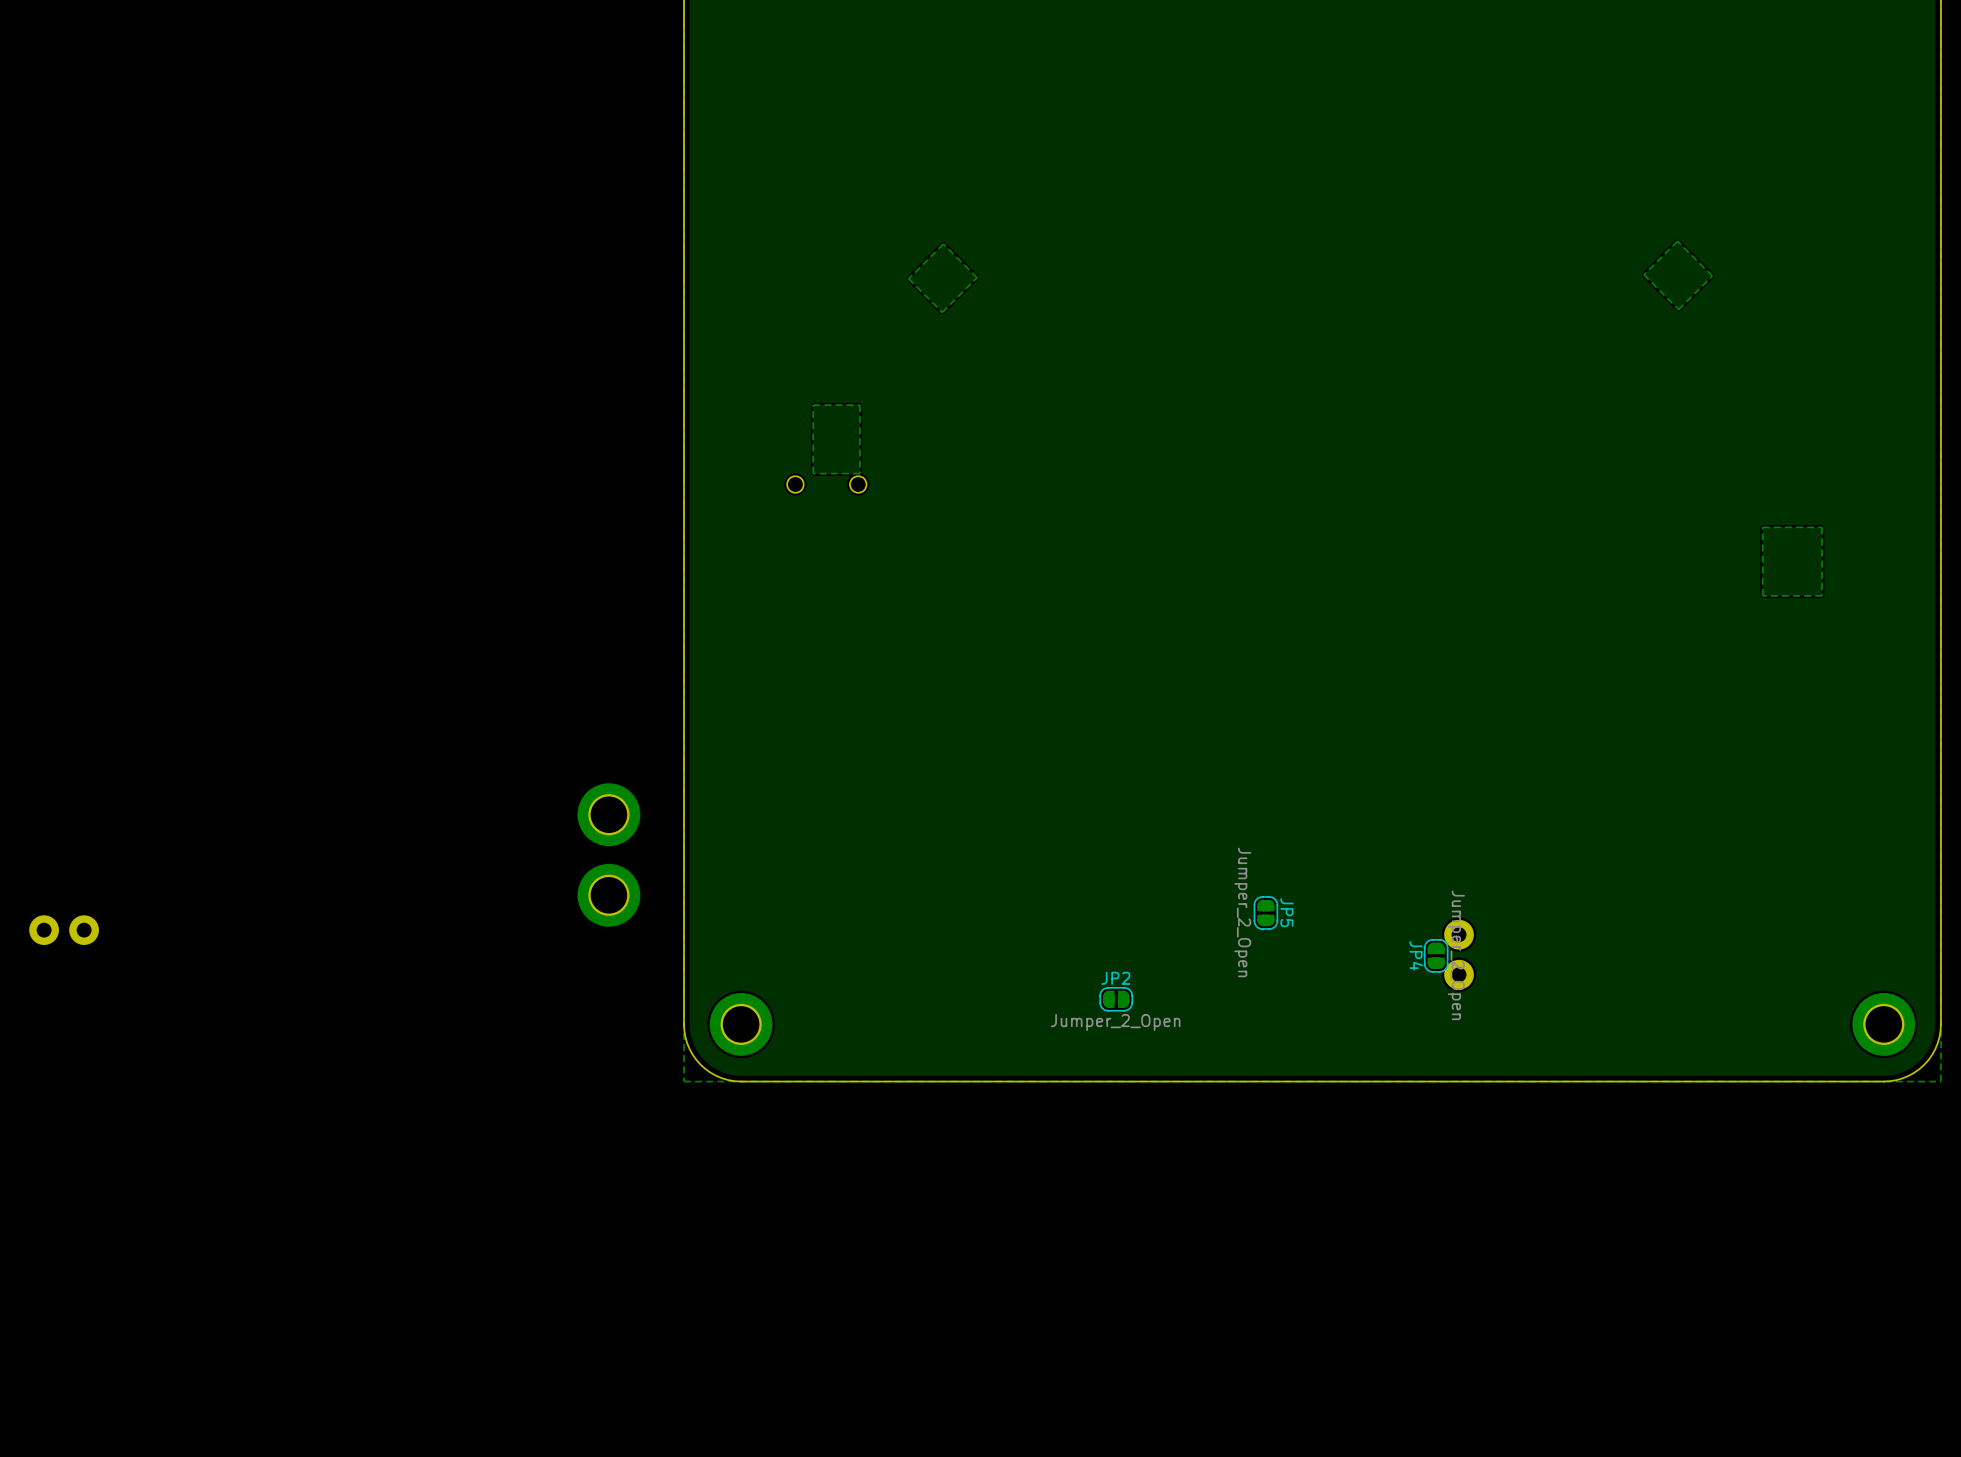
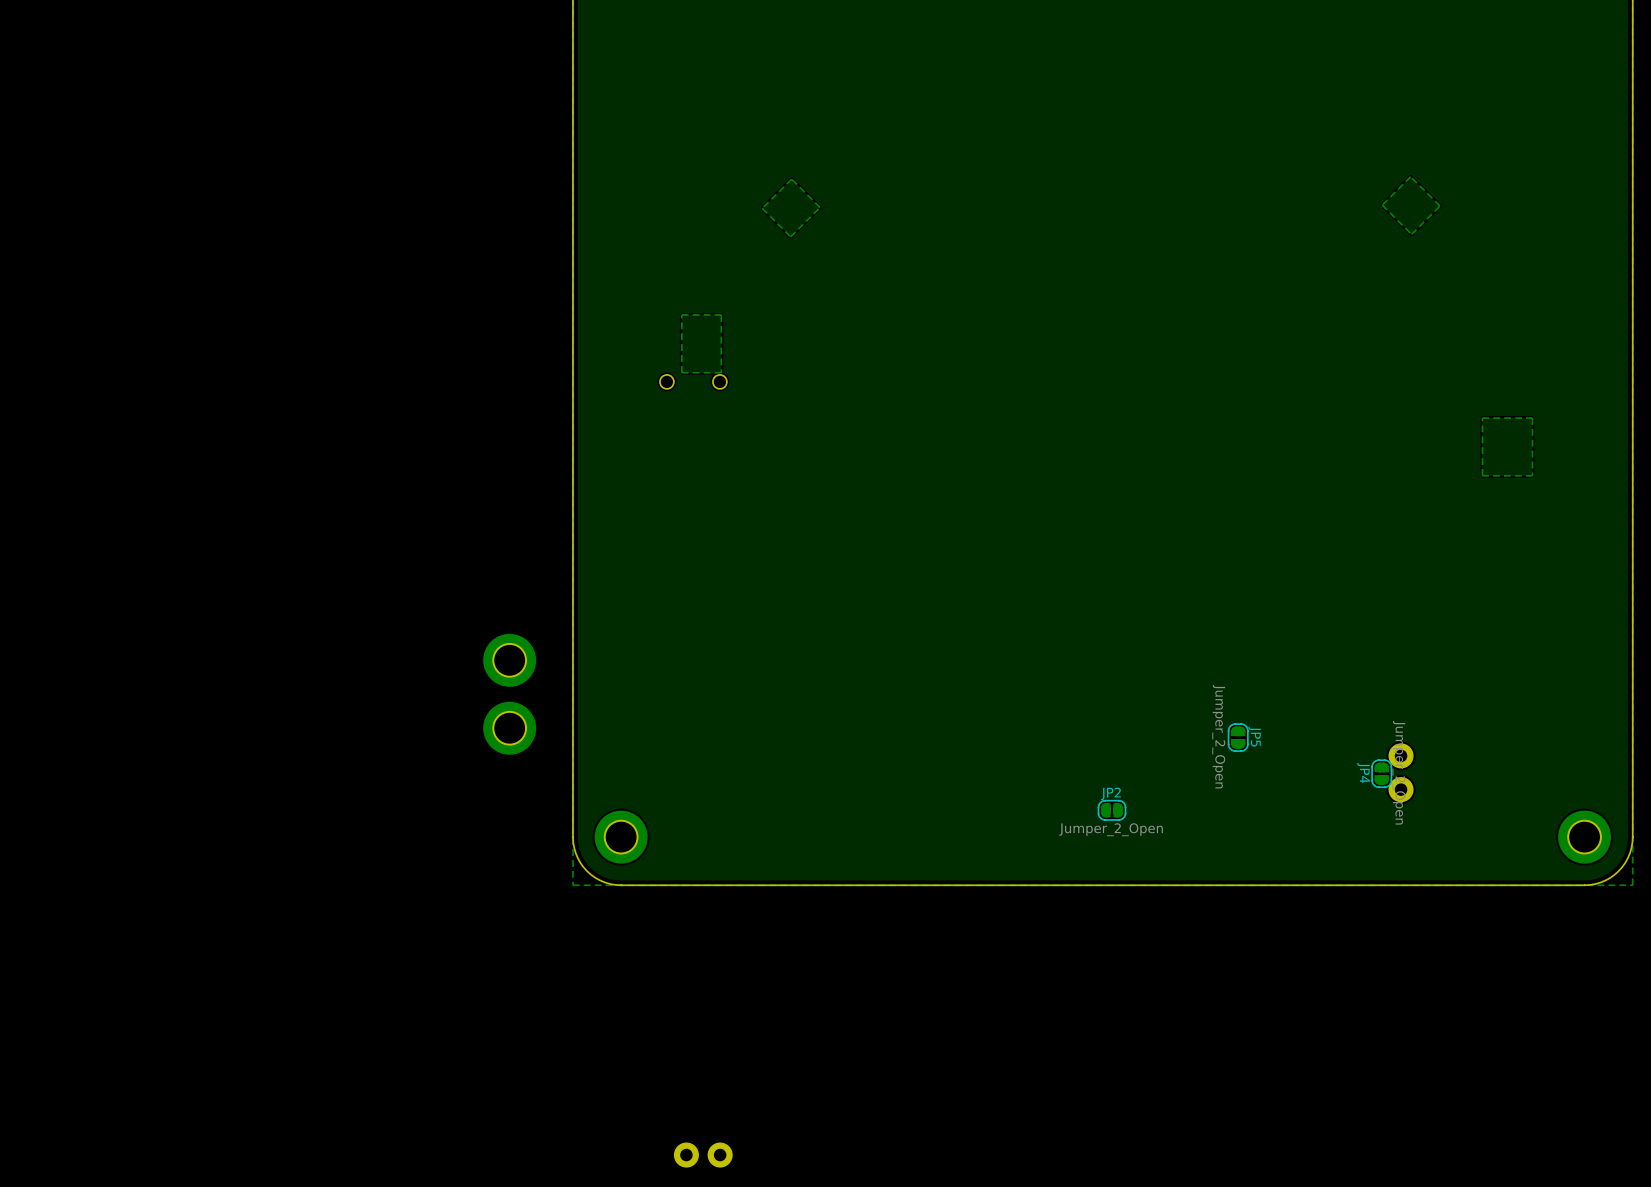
JP5 position: (1265, 913) -> (1238, 737)
part: (64, 930) -> none
part position: (1459, 954) -> (1401, 772)
JP4 position: (1436, 955) -> (1381, 773)
JP2 position: (1116, 999) -> (1112, 810)
part: none -> (703, 1155)

